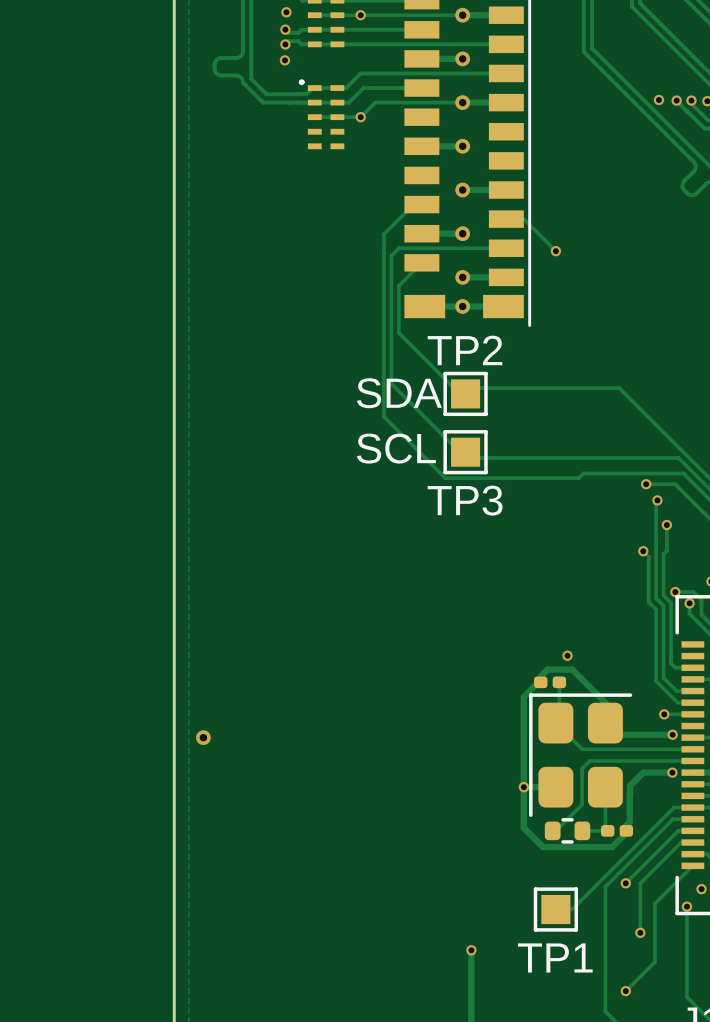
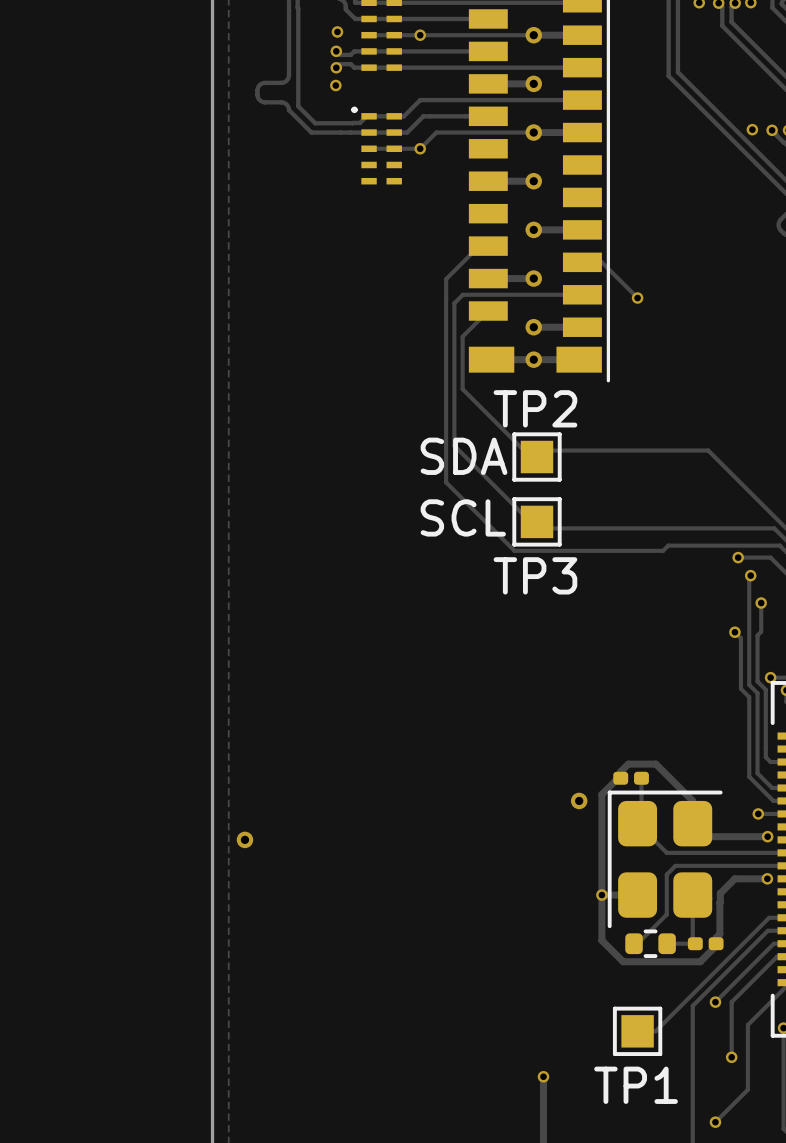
via: (567, 655) -> none
via: none -> (579, 800)

